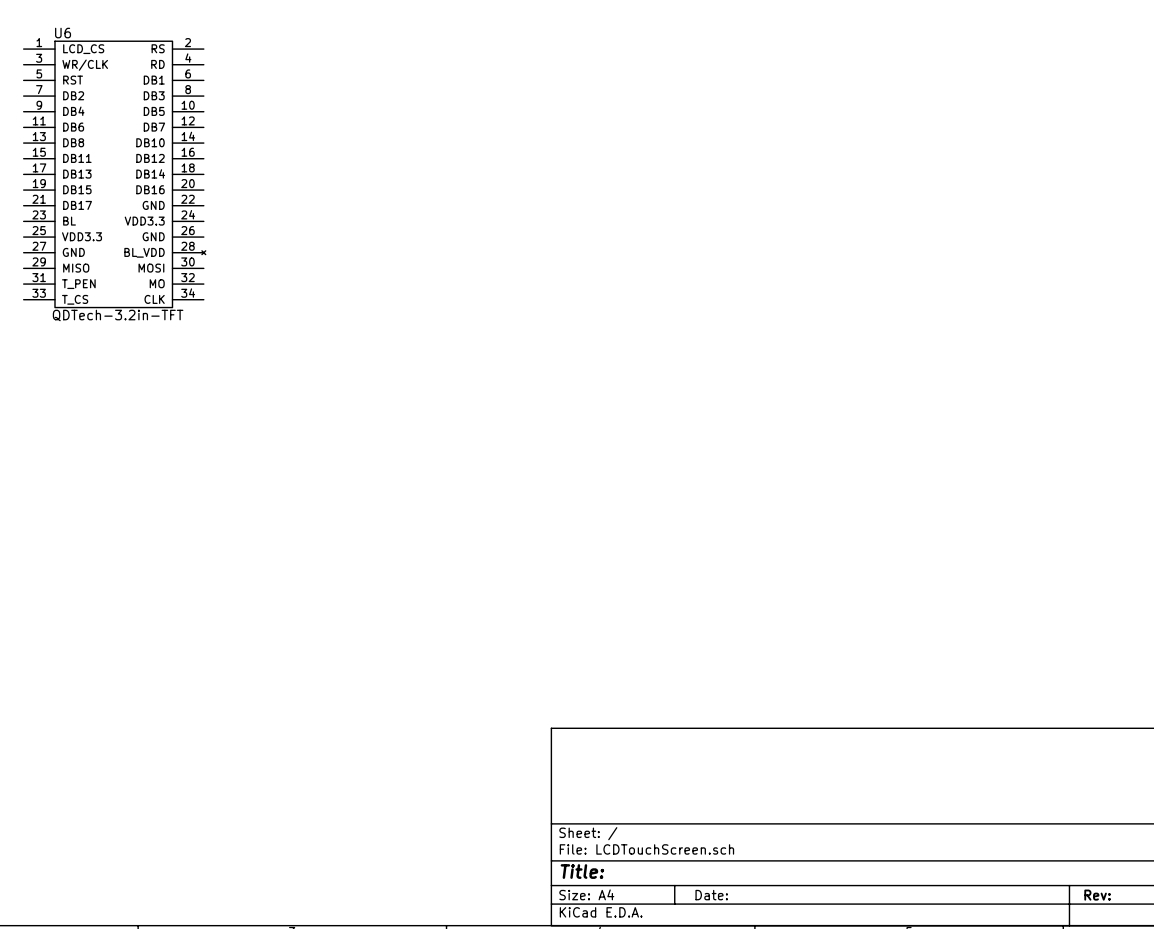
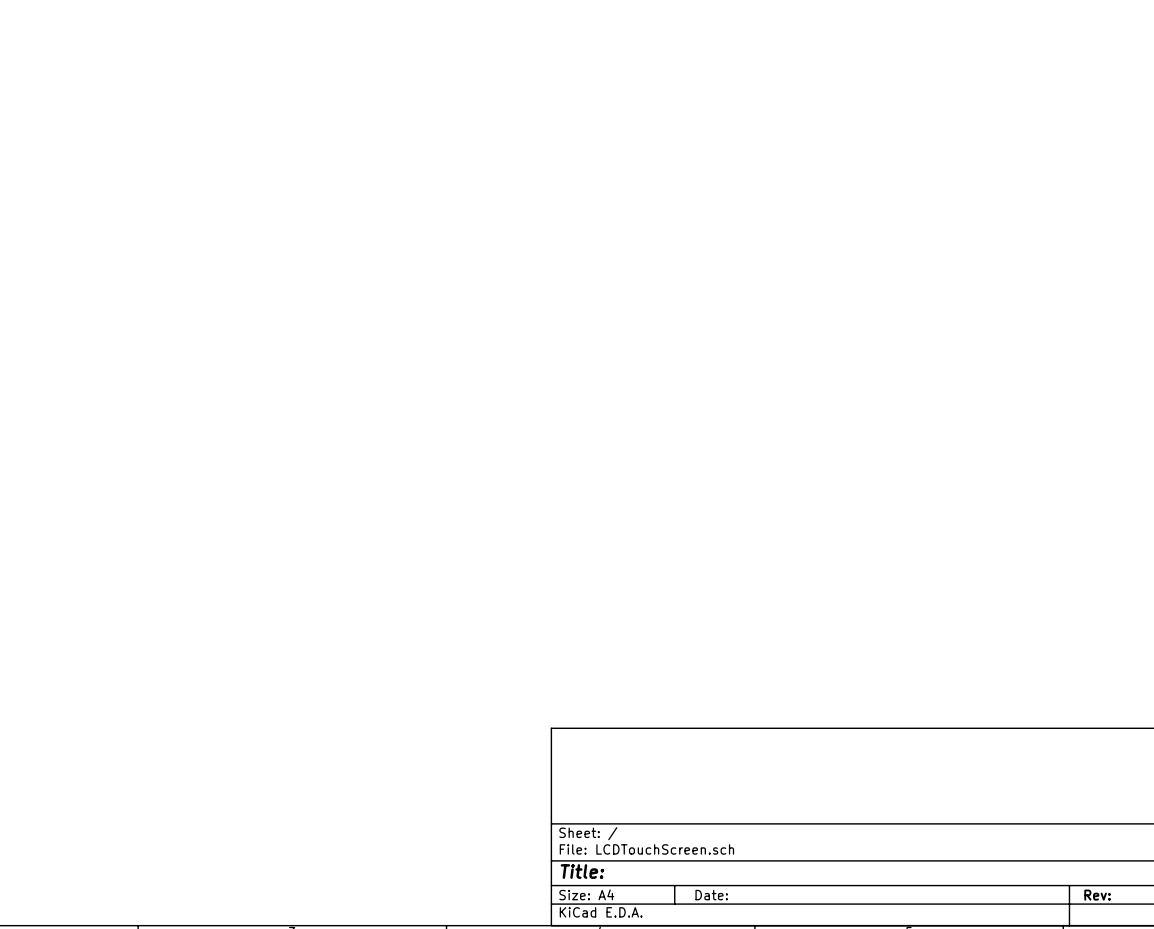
U6: QDTech-3.2in-TFT (114, 174) -> none

